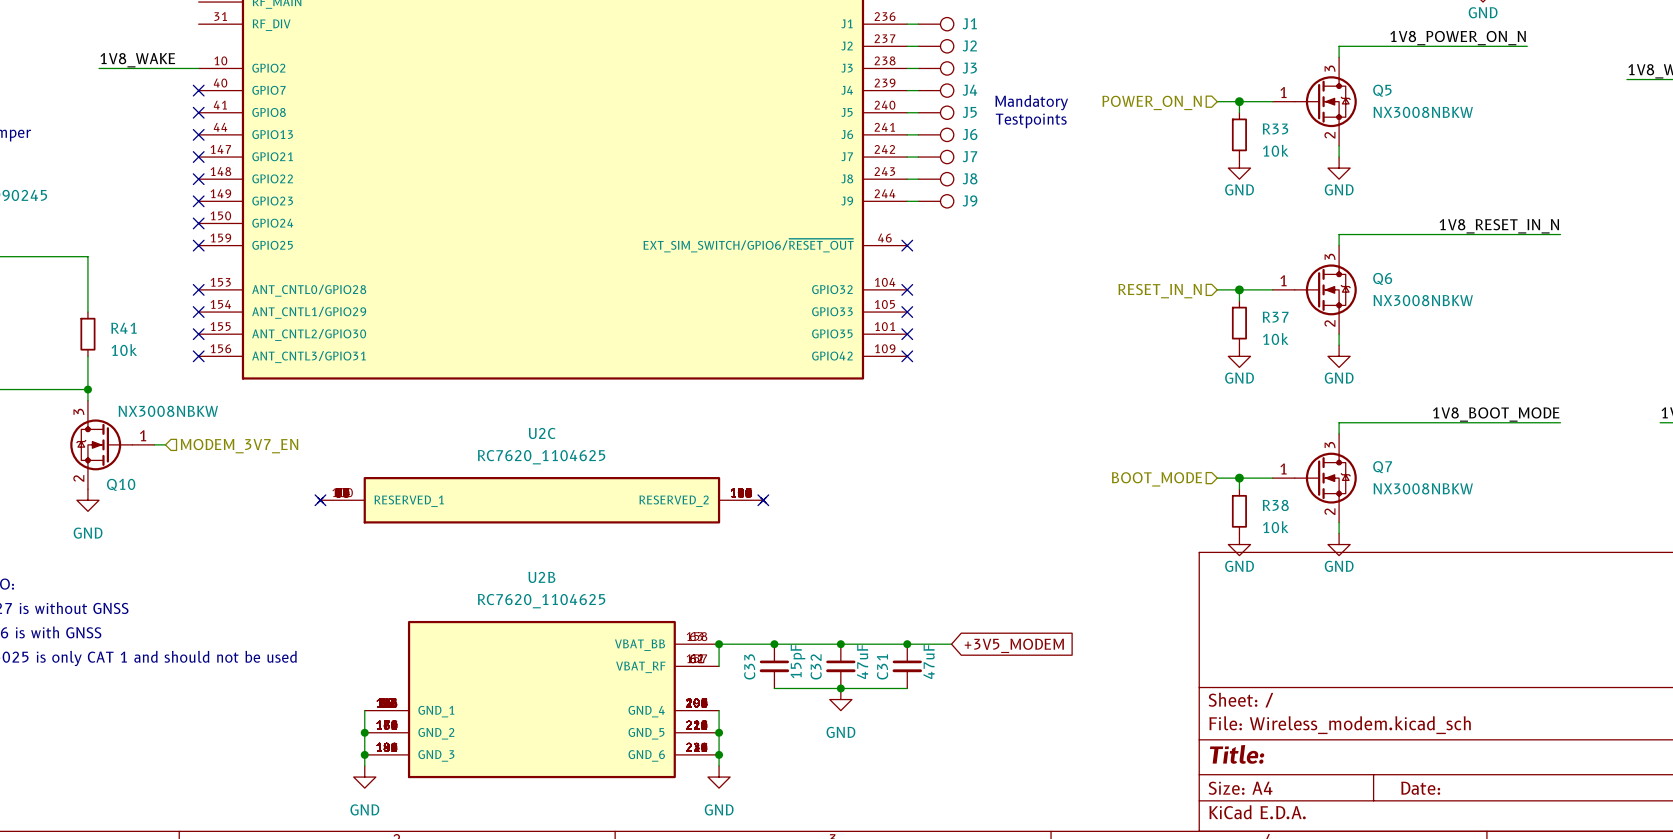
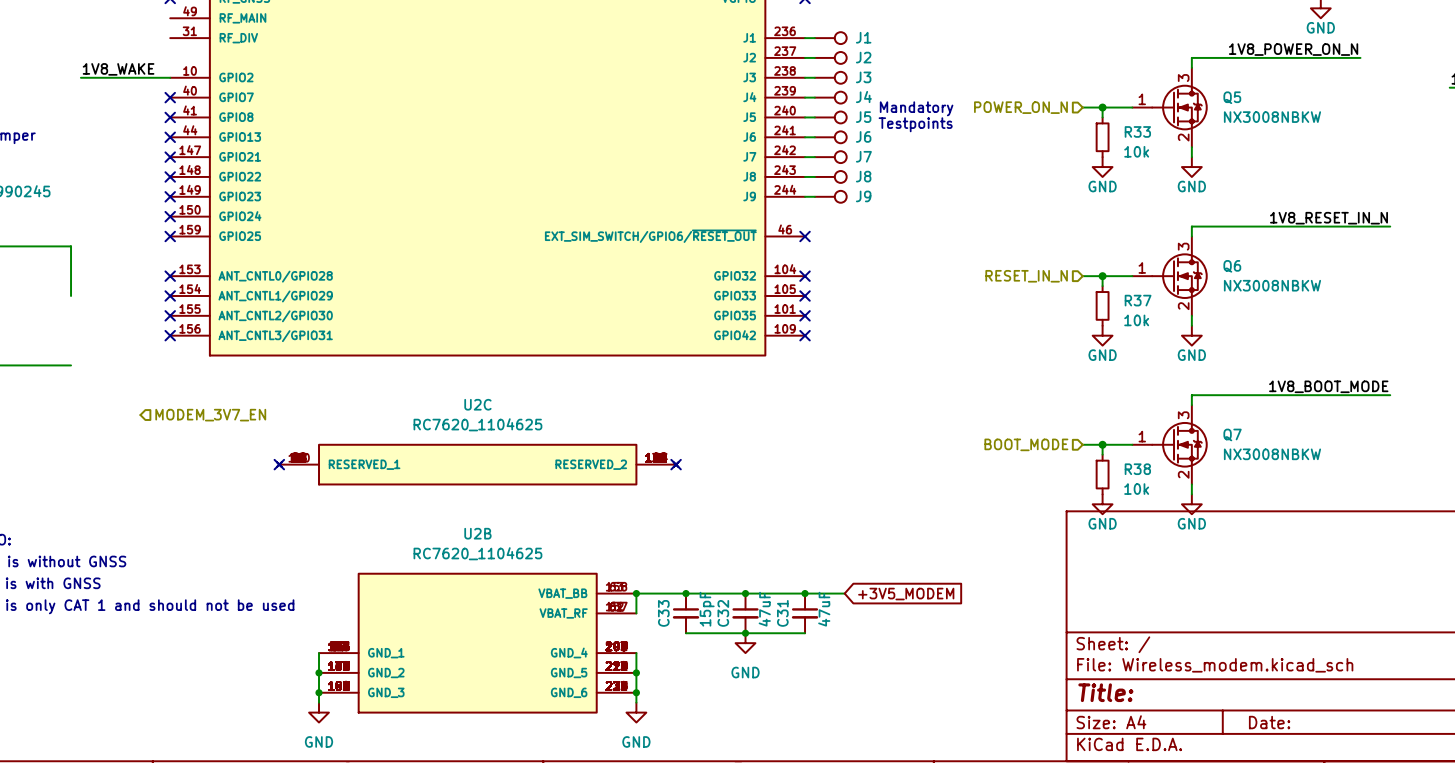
R41: 10k (87, 334) -> none
wire: (87, 356) (87, 400) -> none
junction: (87, 389) -> none
Q10: NX3008NBKW (112, 444) -> none
wire: (154, 444) (165, 444) -> none
power symbol: GND (87, 500) -> none

